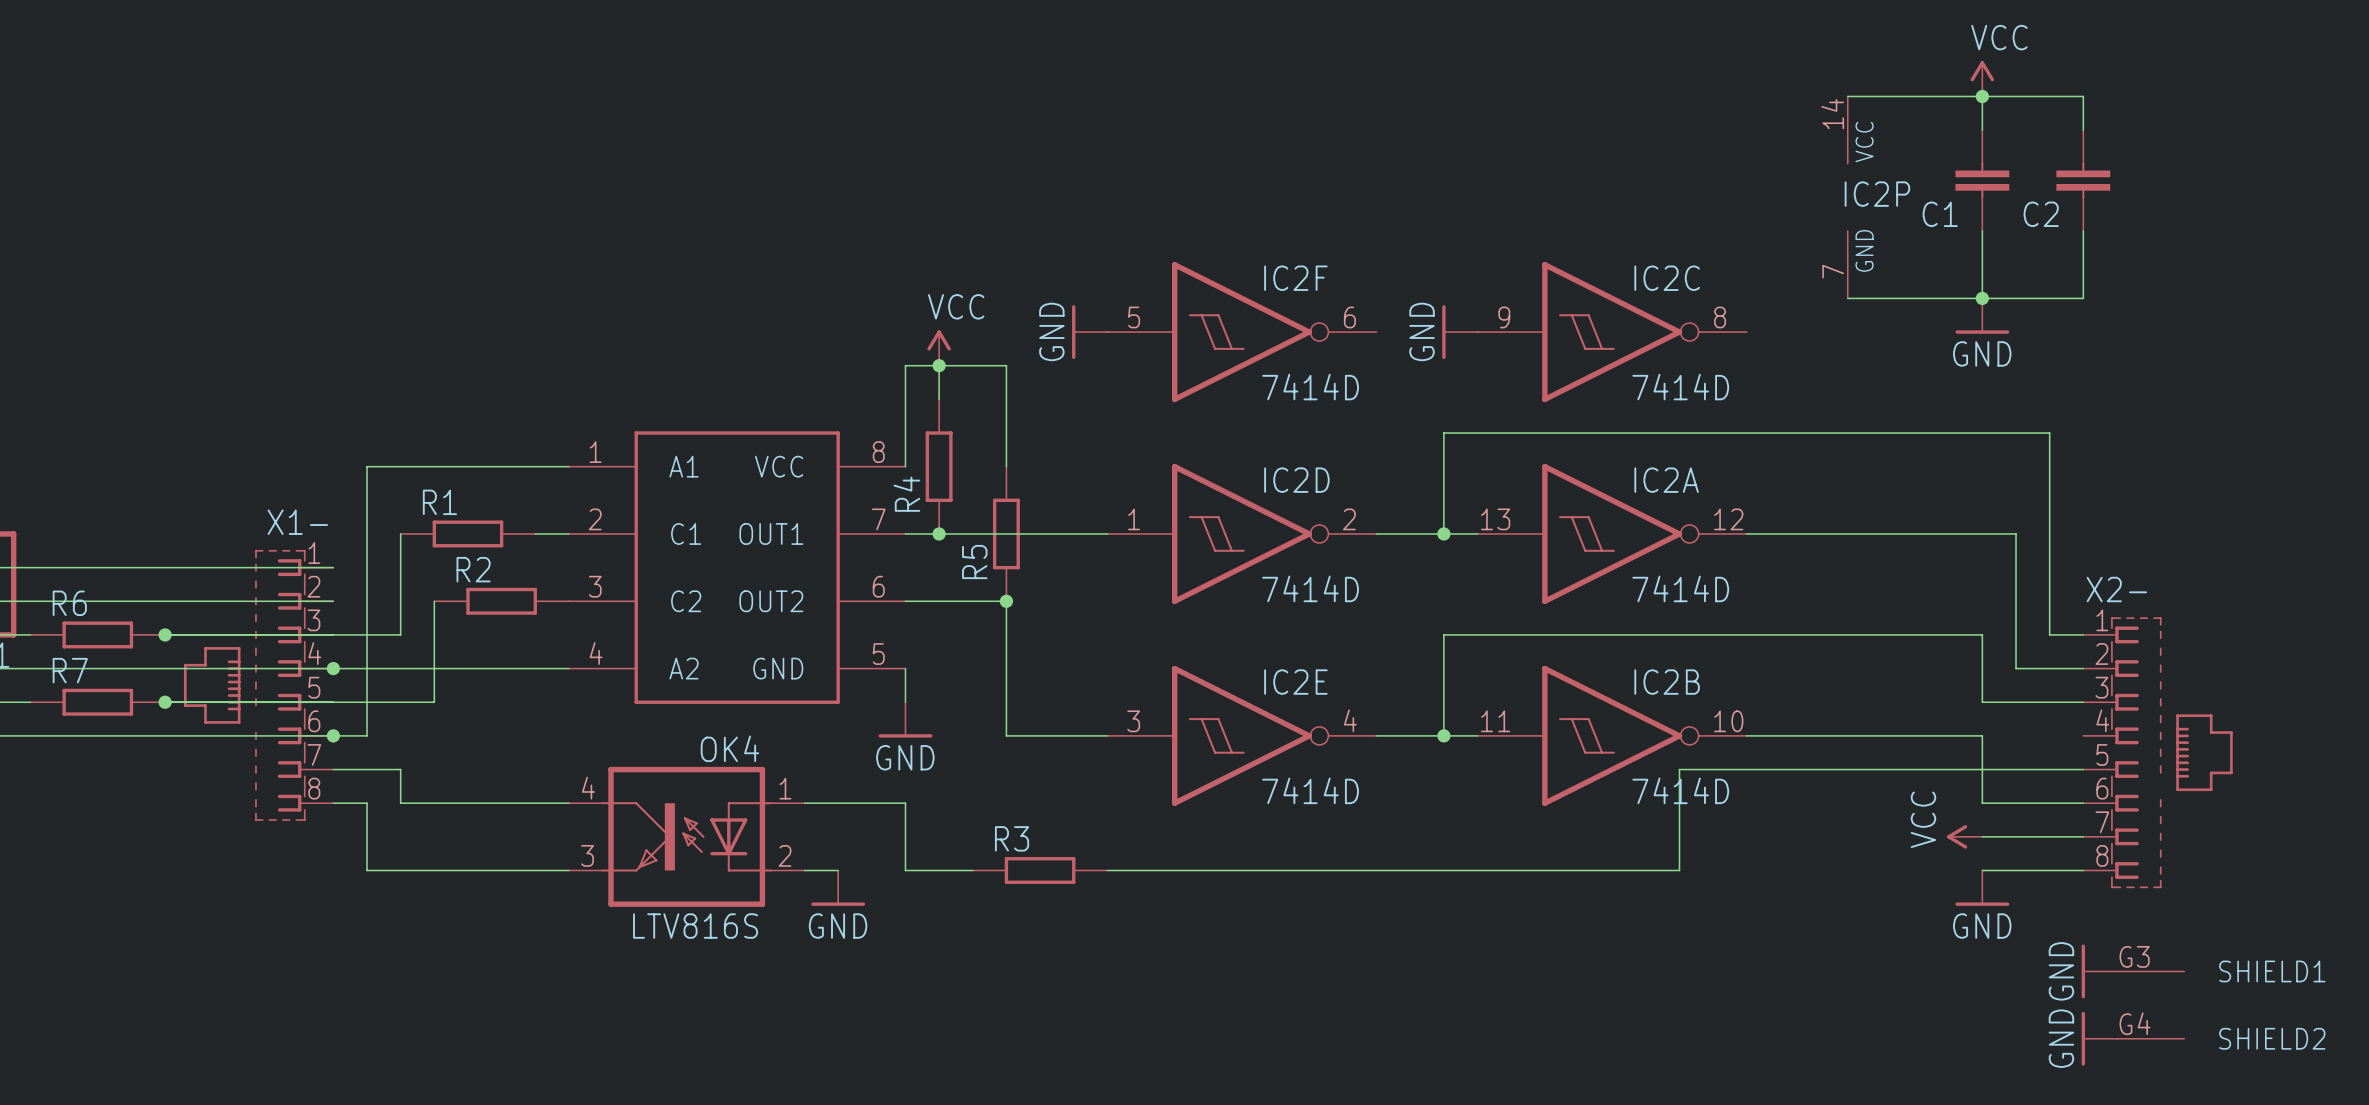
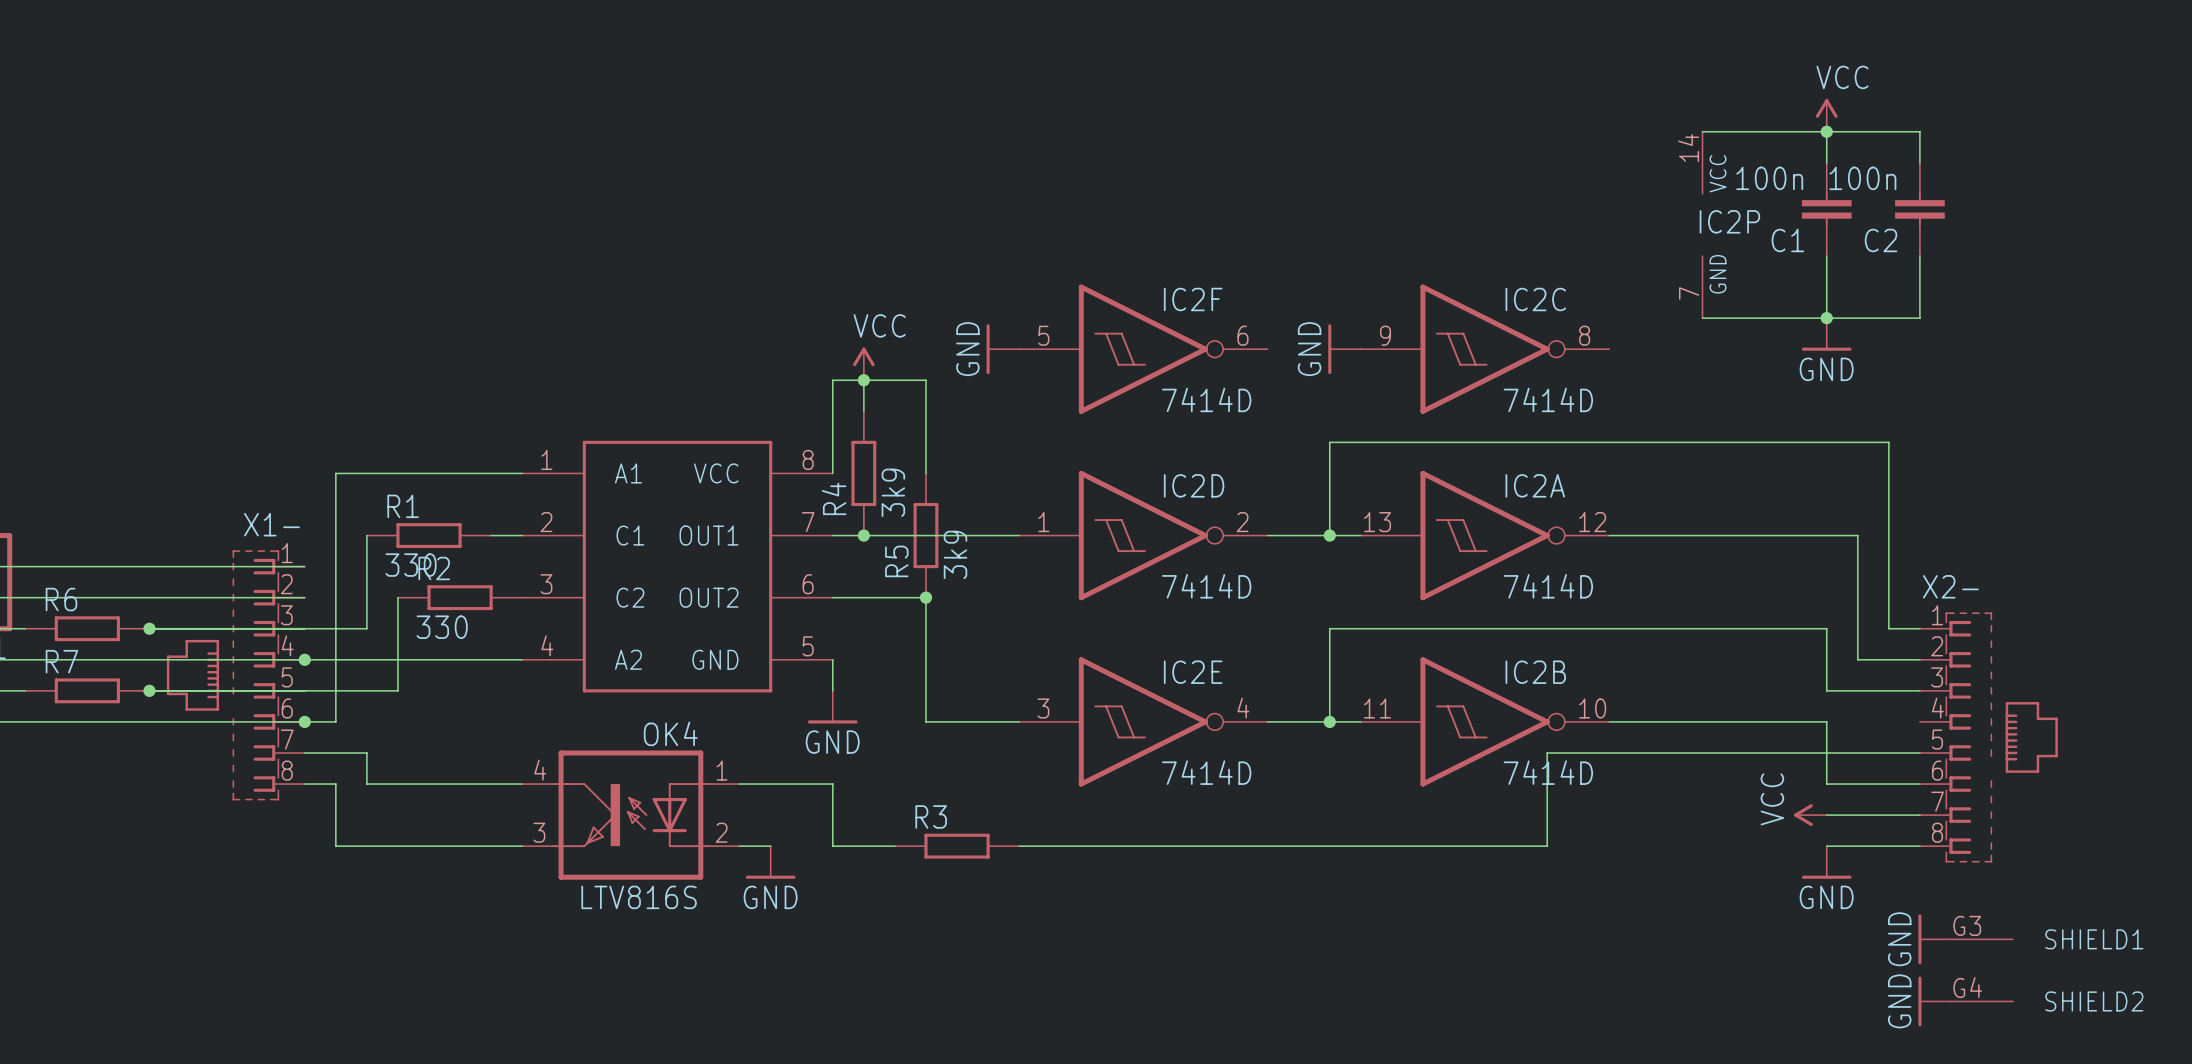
C1 value: none -> 100n (1769, 178)
C2 value: none -> 100n (1862, 178)
R4 value: none -> 3k9 (893, 492)
R5 value: none -> 3k9 (955, 554)
R1 value: none -> 330 (411, 565)
R2 value: none -> 330 (442, 627)

